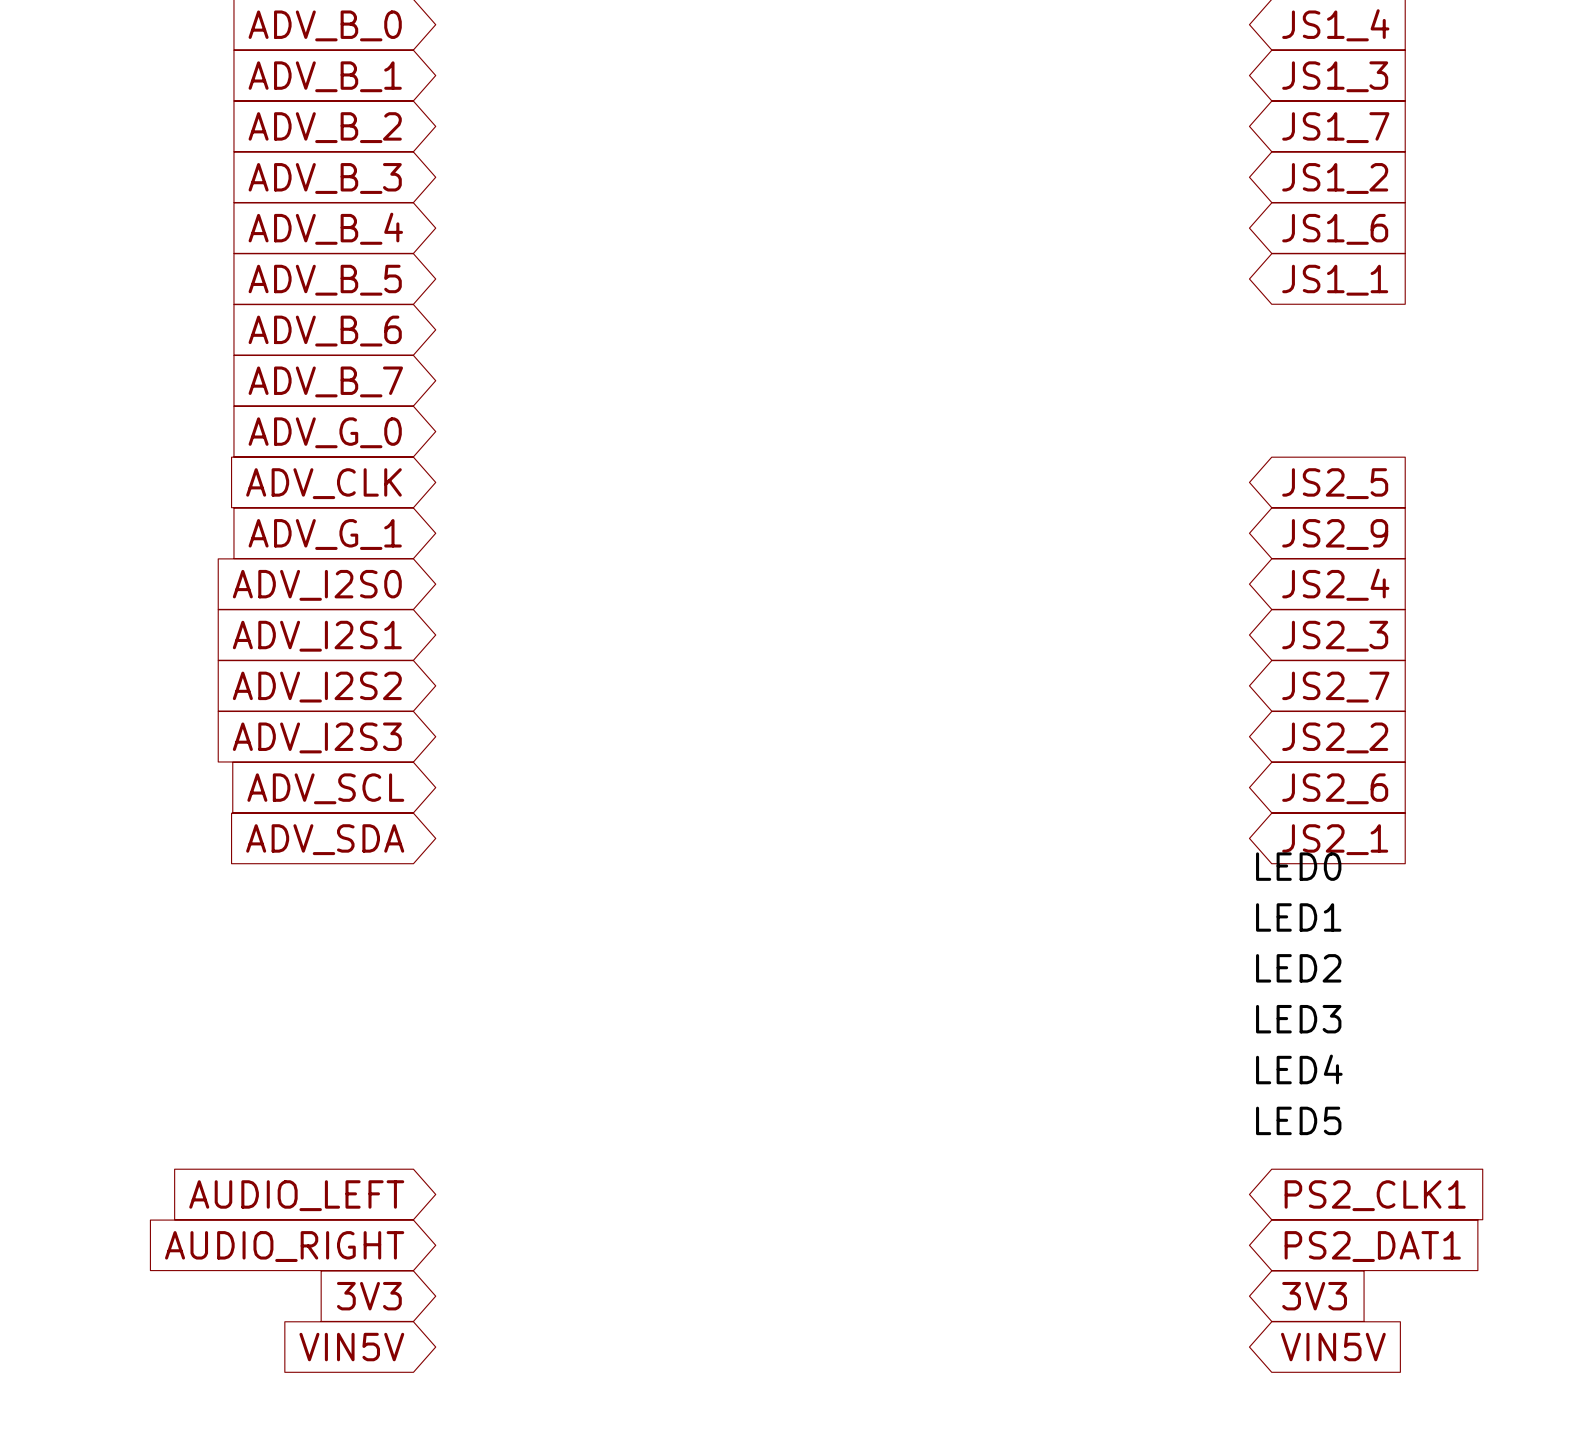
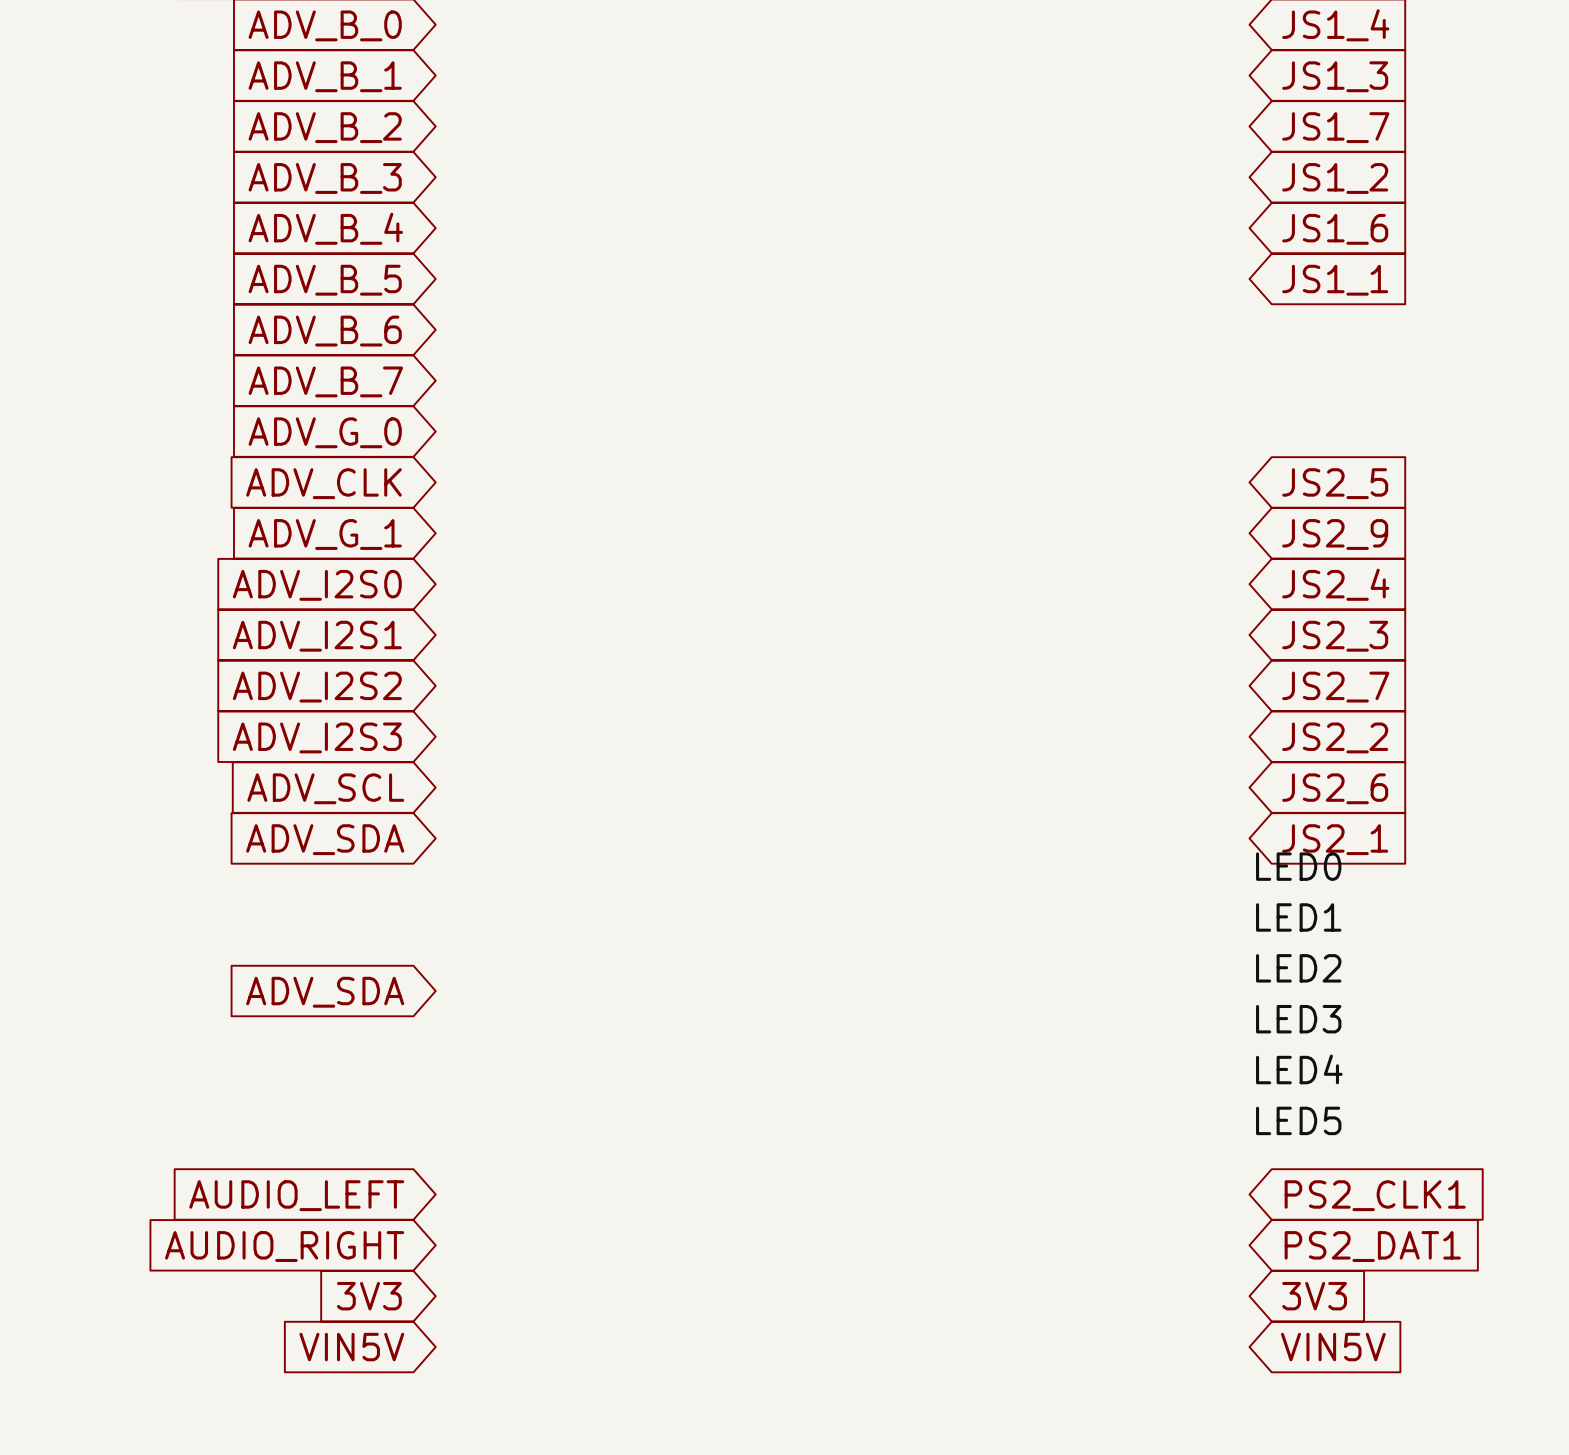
global label: none -> ADV_SDA (325, 992)

